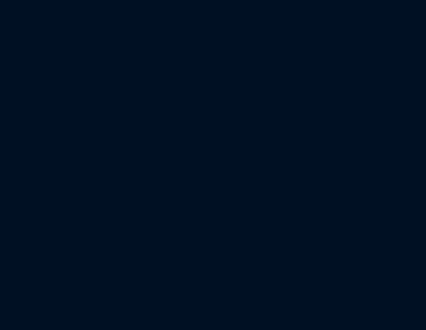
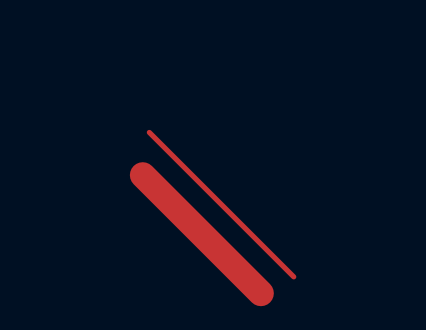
top track: none -> (149, 132) (293, 276)
top track: none -> (142, 175) (260, 293)

